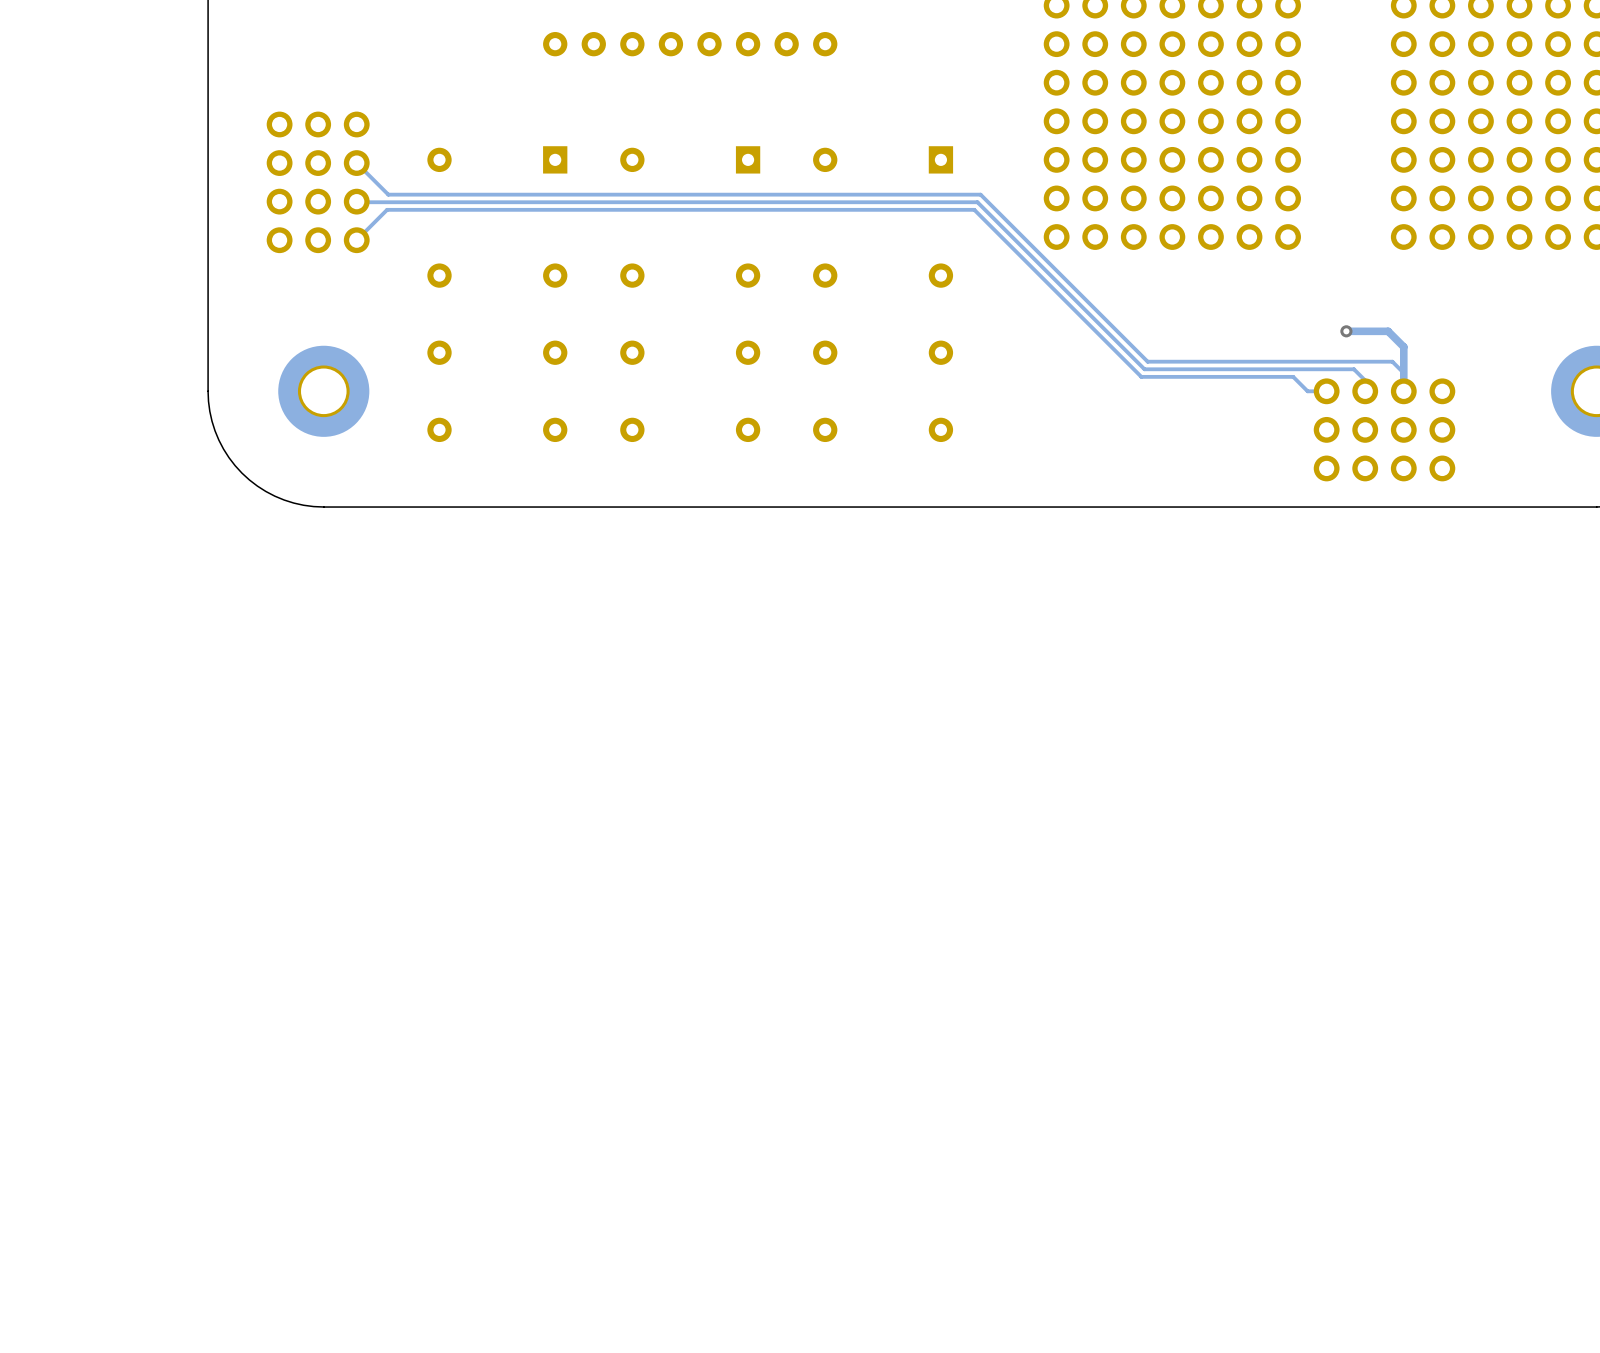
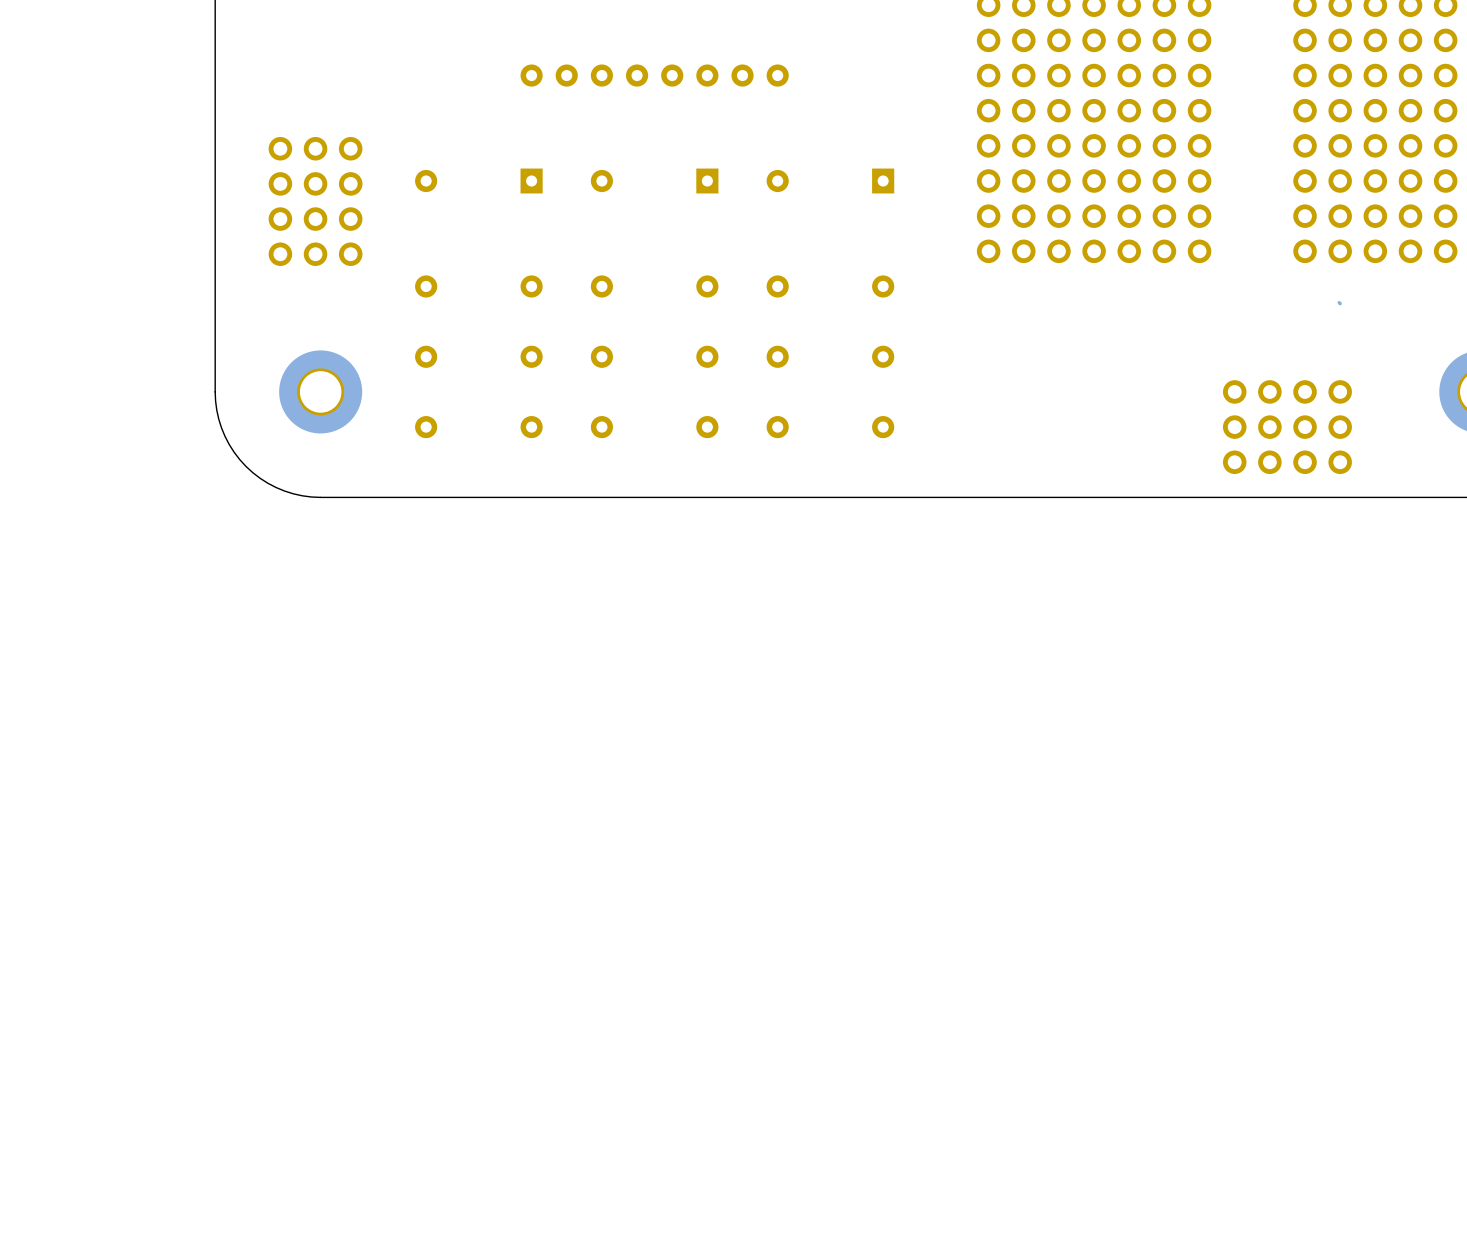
track: (356, 163) (388, 194) (980, 194) (1147, 361) (1392, 361) (1403, 373) -> none
track: (356, 201) (977, 202) (1144, 369) (1353, 369) (1365, 380) (1365, 391) -> none
track: (356, 240) (387, 209) (974, 209) (1141, 376) (1293, 376) (1307, 391) (1326, 391) -> none
track: none -> (1339, 302) (1340, 303)
track: (1346, 331) (1388, 331) (1403, 346) (1403, 391) -> none
via: (1346, 331) -> none

